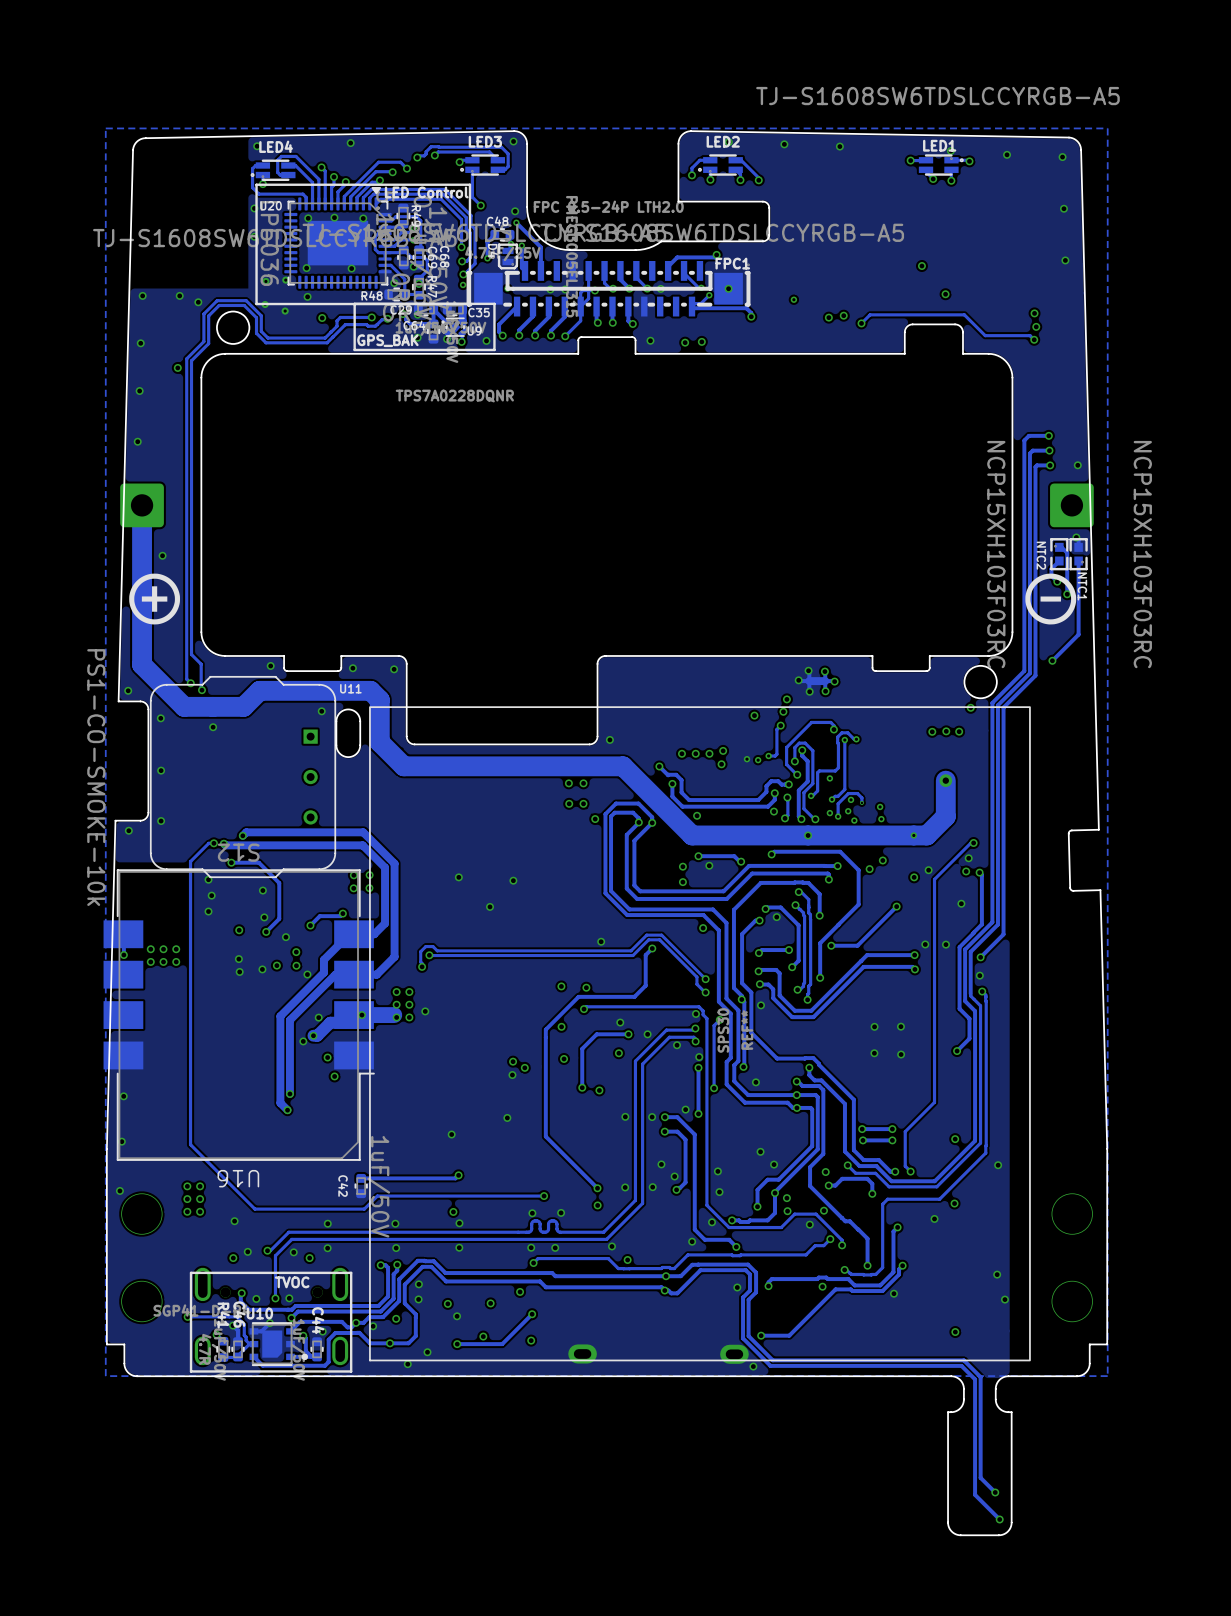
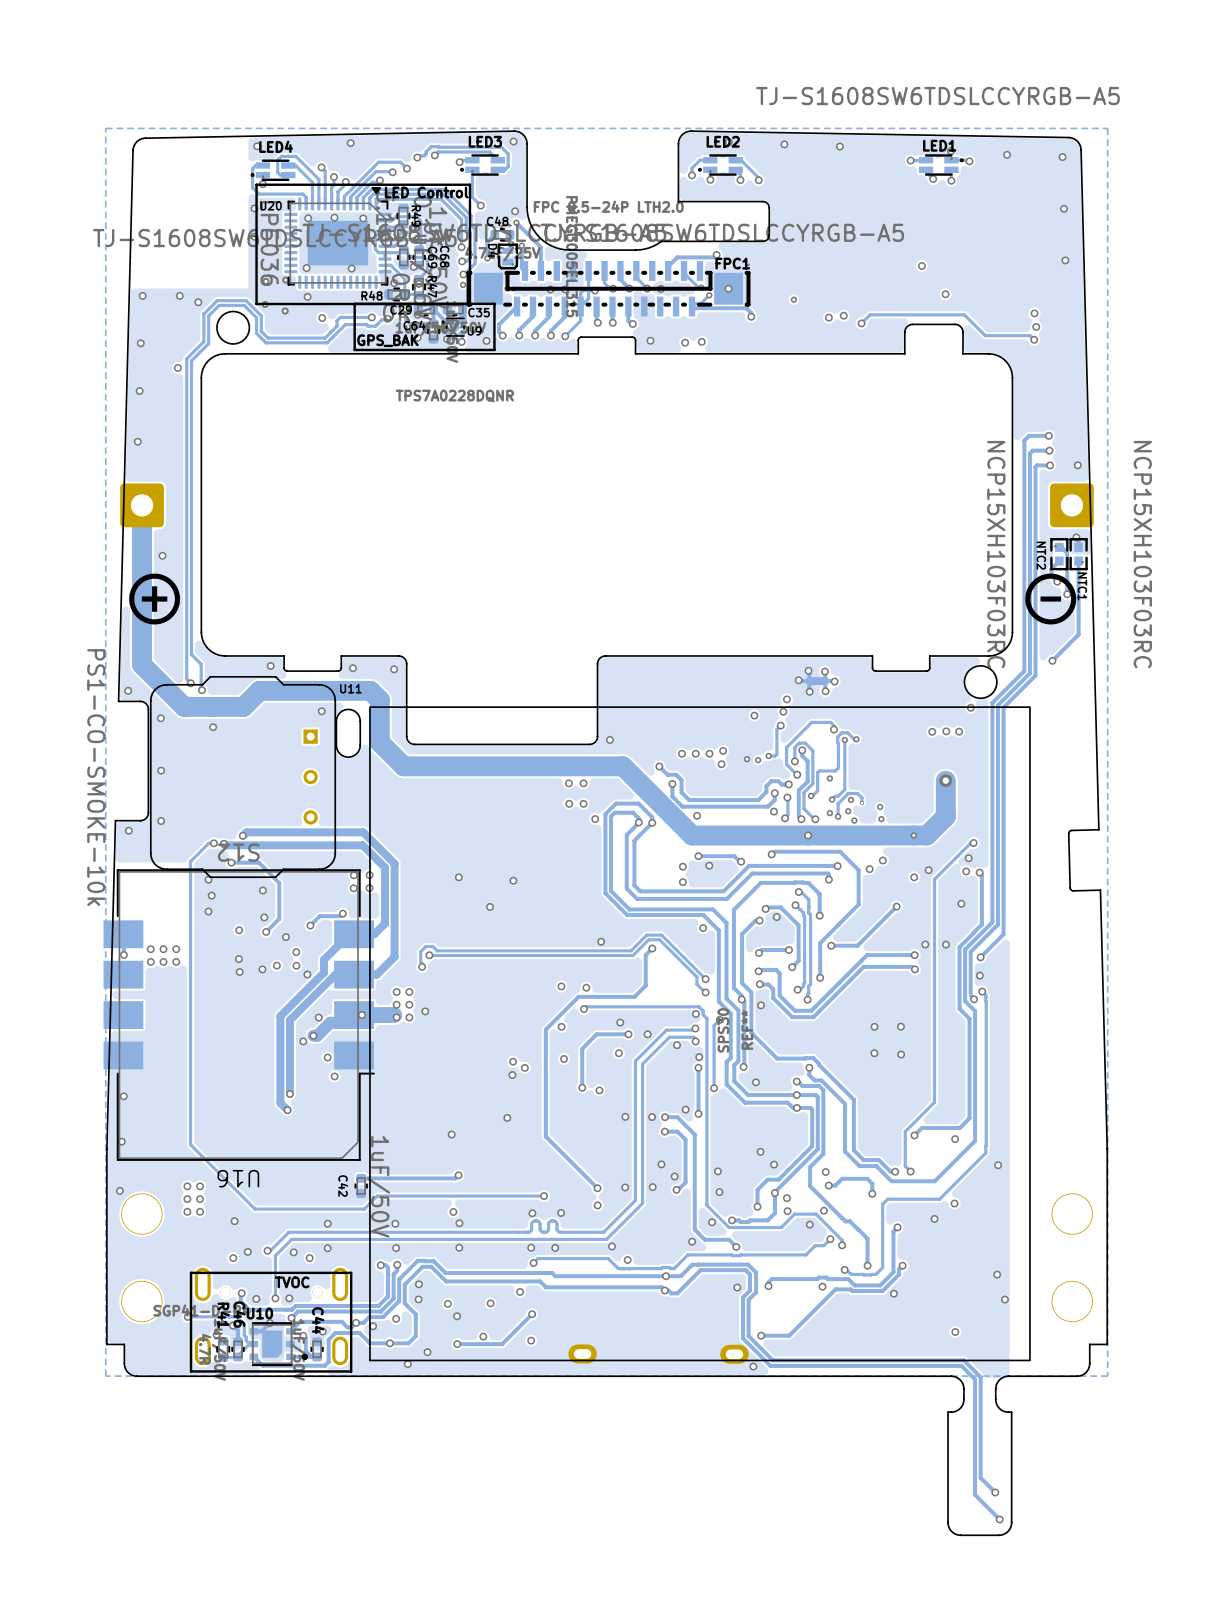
track: (974, 999) (980, 1005) (980, 1143) (936, 1186) (889, 1186) (875, 1173) (855, 1173) (847, 1165) -> none
via: none -> (974, 999)
track: (969, 1038) (957, 1051) -> (969, 1038) (969, 1118) (959, 1127) (921, 1127) (914, 1135)
via: (957, 1051) -> none
via: (862, 1129) -> none
track: (892, 1129) (862, 1129) -> none
via: (892, 1129) -> none
via: none -> (914, 1135)
via: (862, 1140) -> none
track: (892, 1140) (862, 1140) -> none
via: (892, 1140) -> none
via: (847, 1165) -> none

